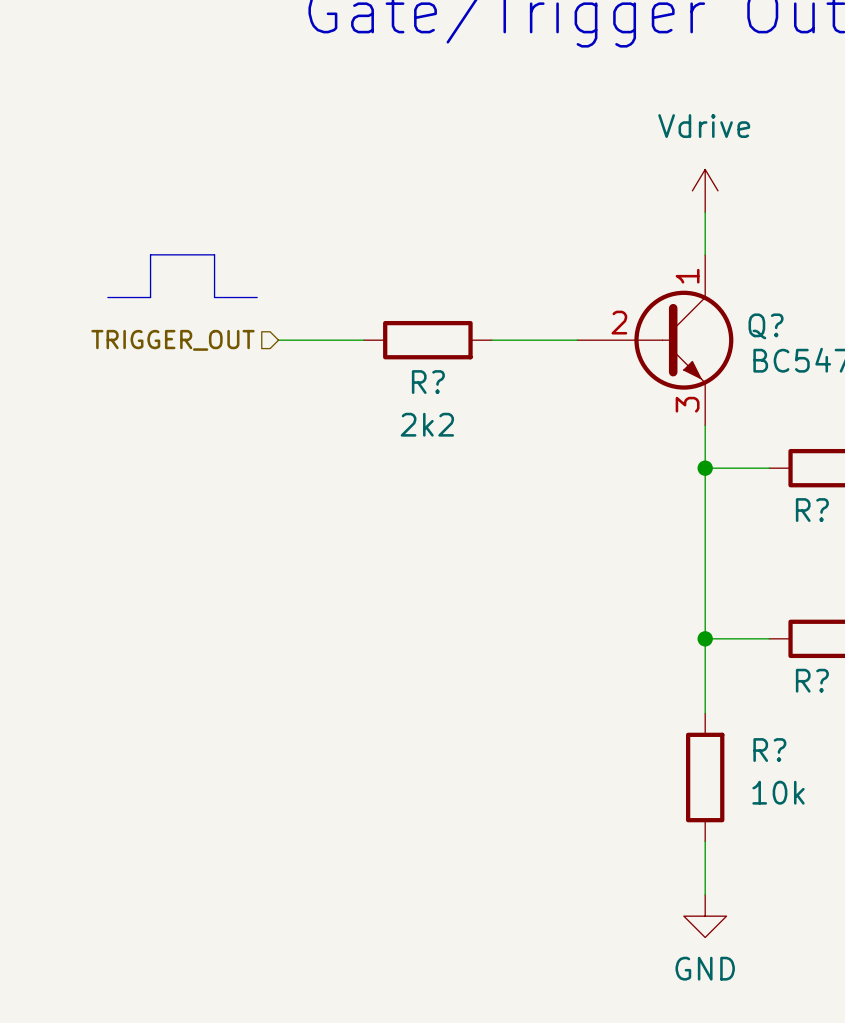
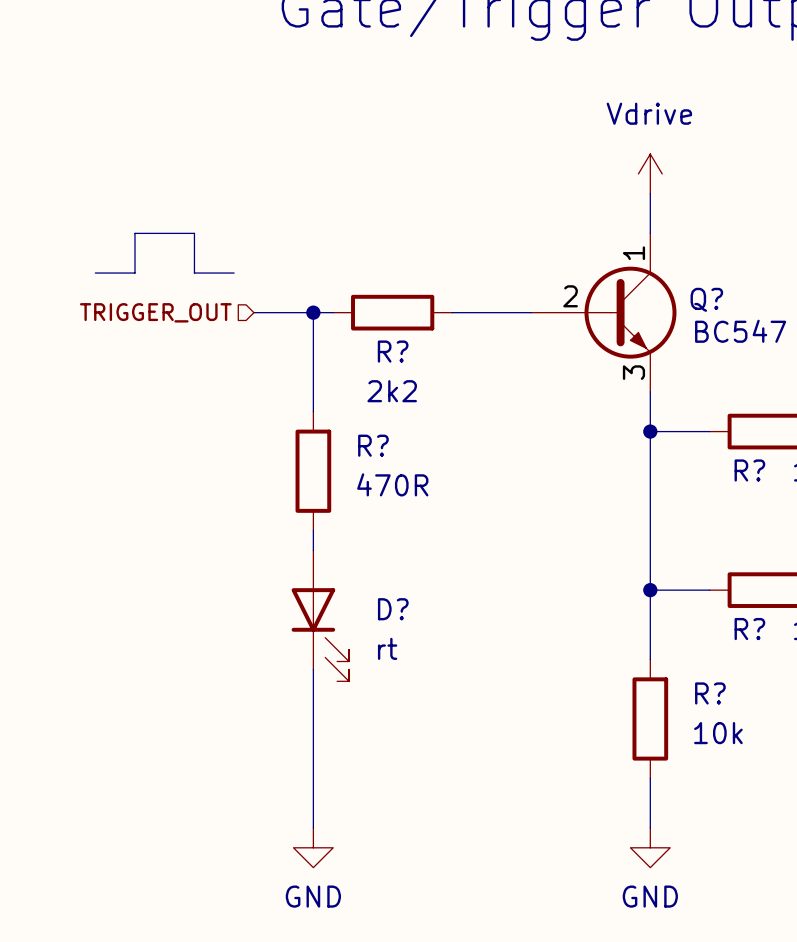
wire: none -> (313, 312) (313, 411)
junction: none -> (313, 312)
R?: none -> 470R (313, 471)
wire: none -> (313, 530) (313, 550)
D?: none -> rt (320, 615)
wire: none -> (313, 669) (313, 827)
power symbol: none -> GND (313, 847)

